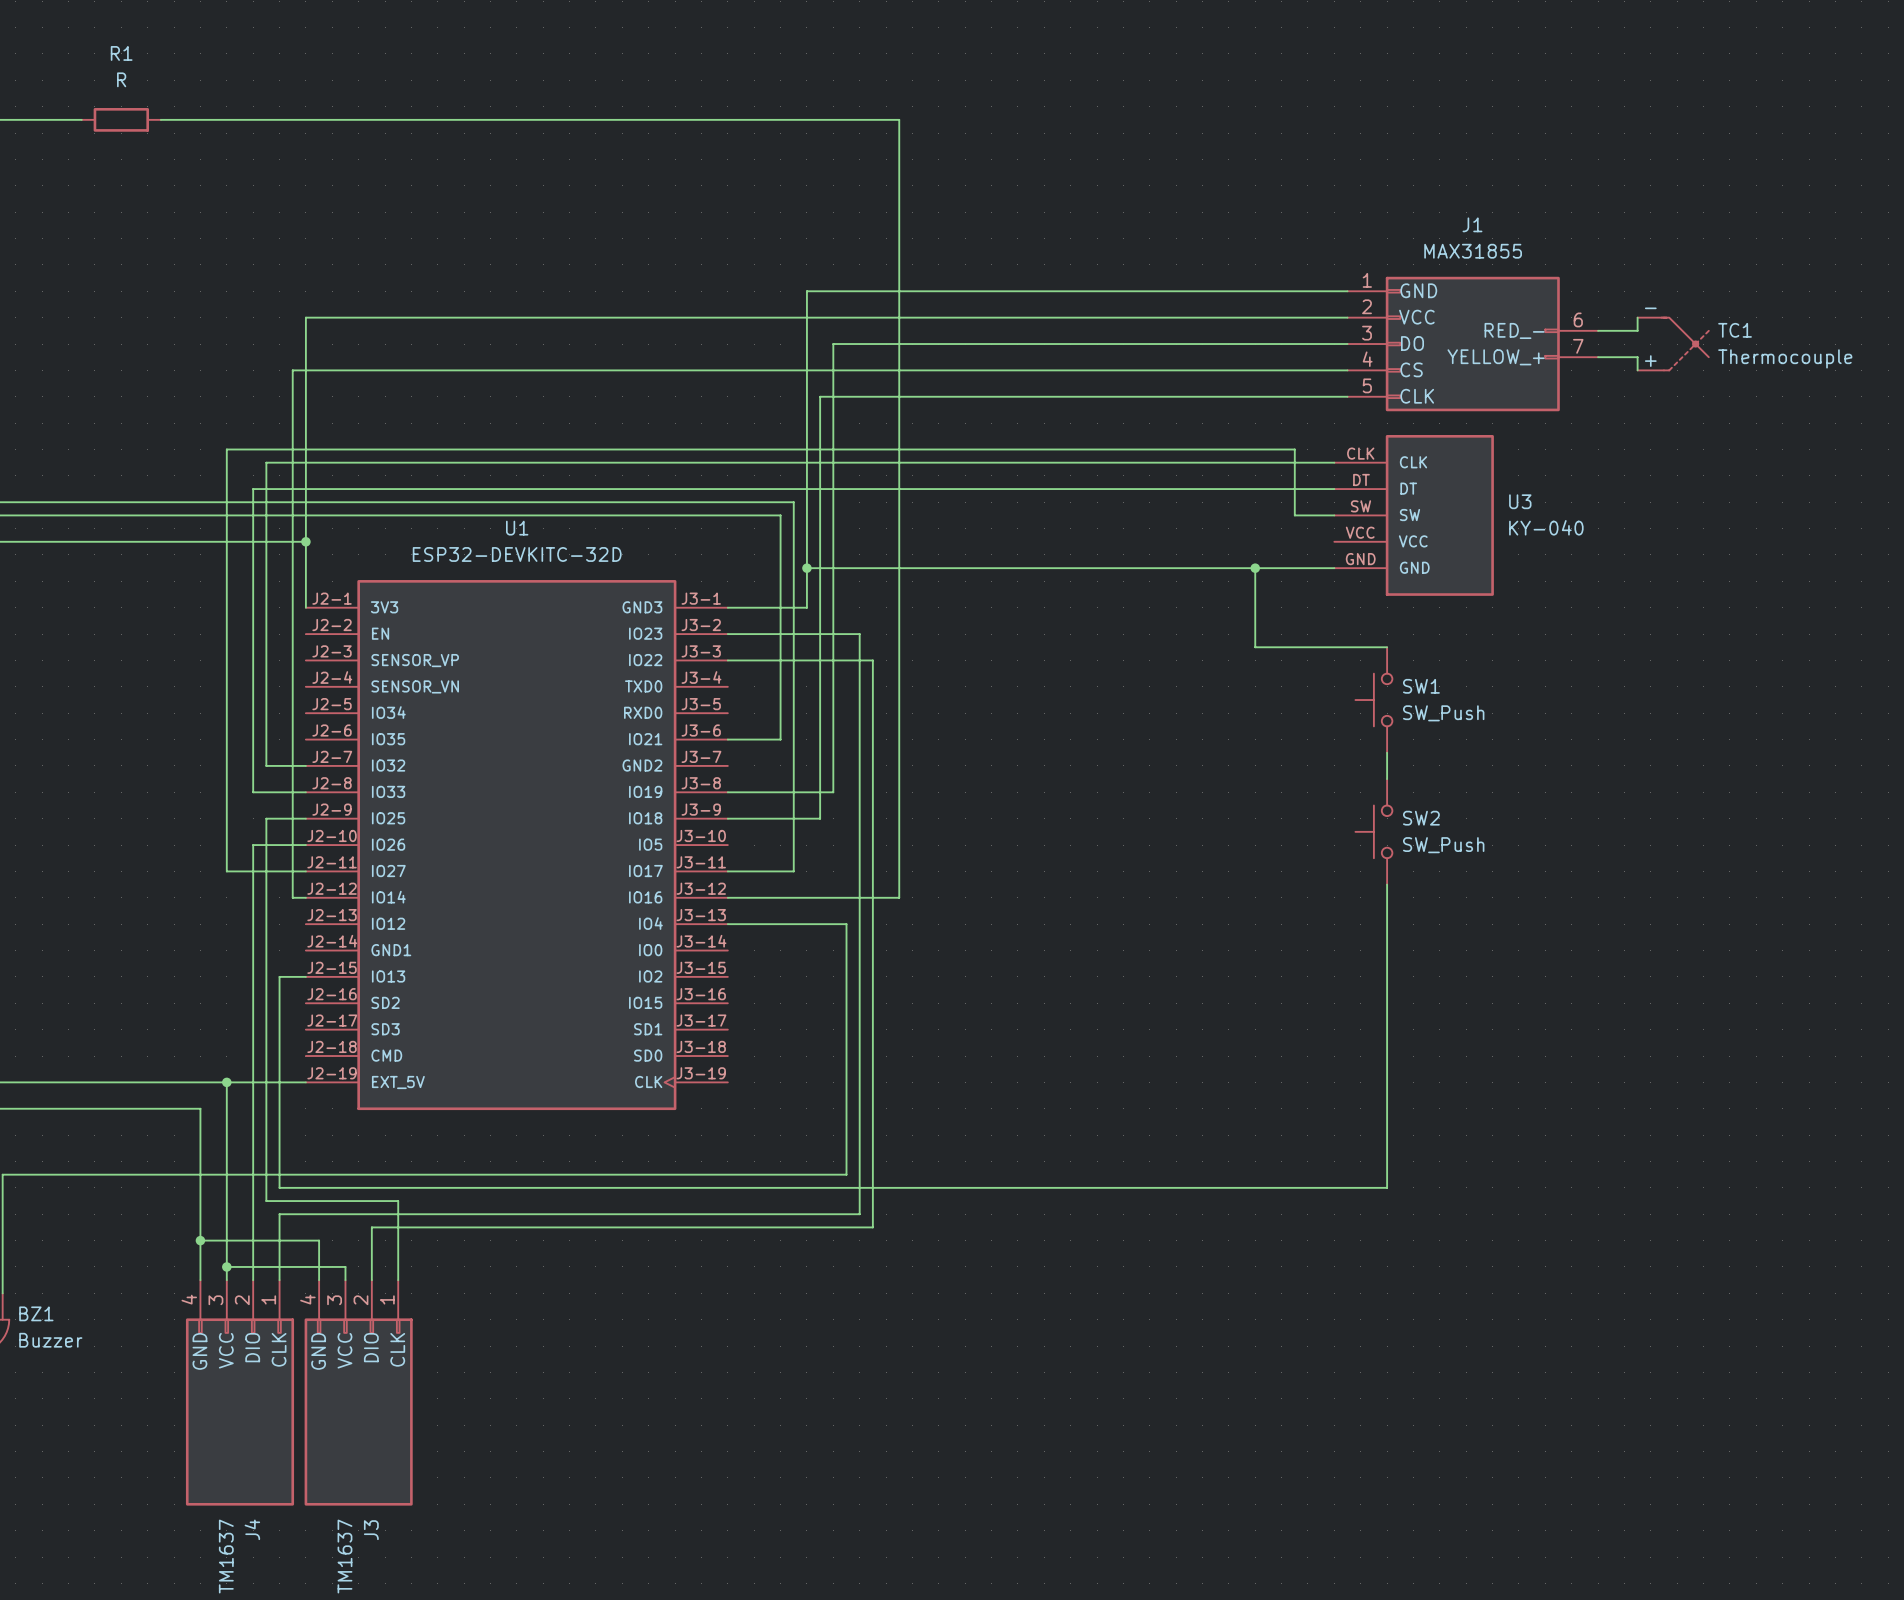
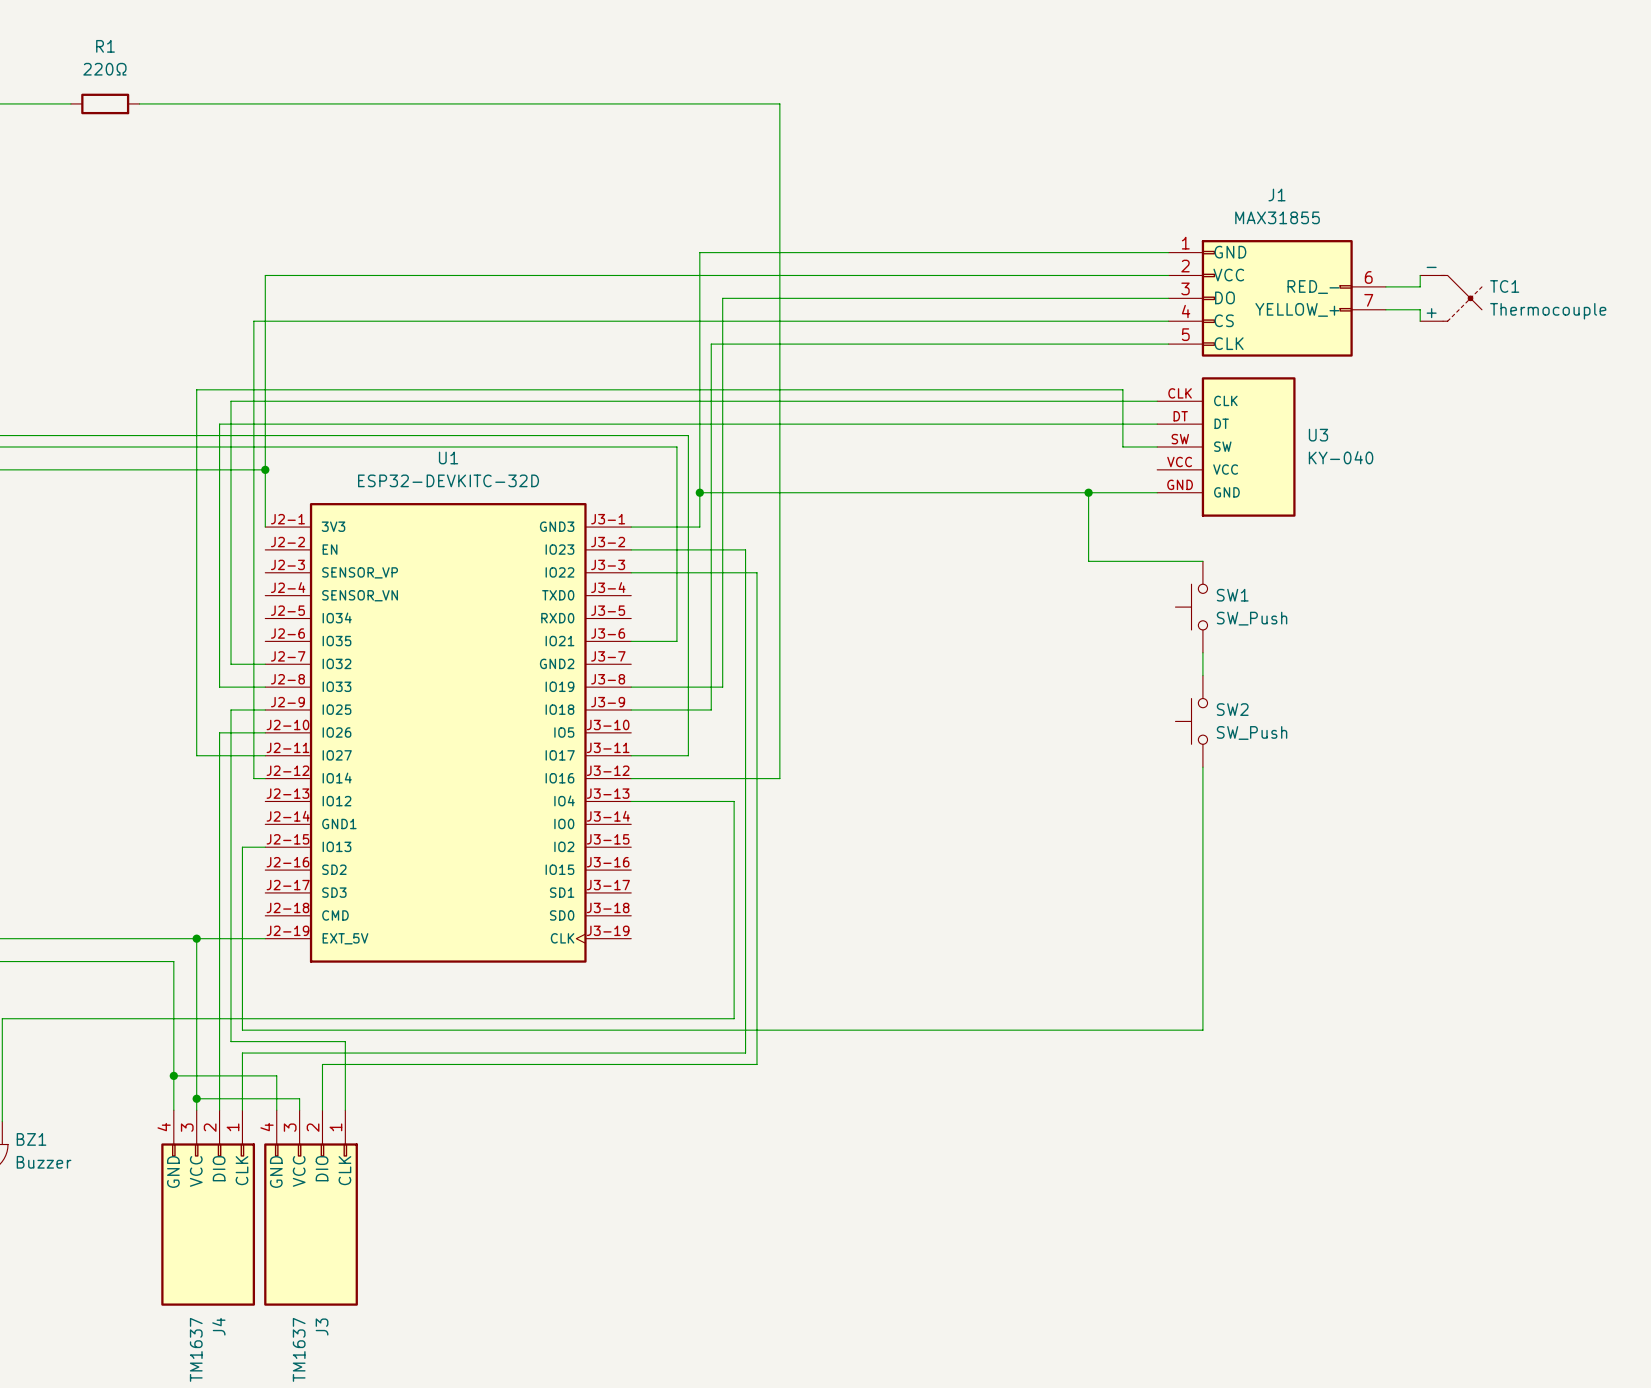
R1 value: R (121, 79) -> 220Ω (104, 69)

